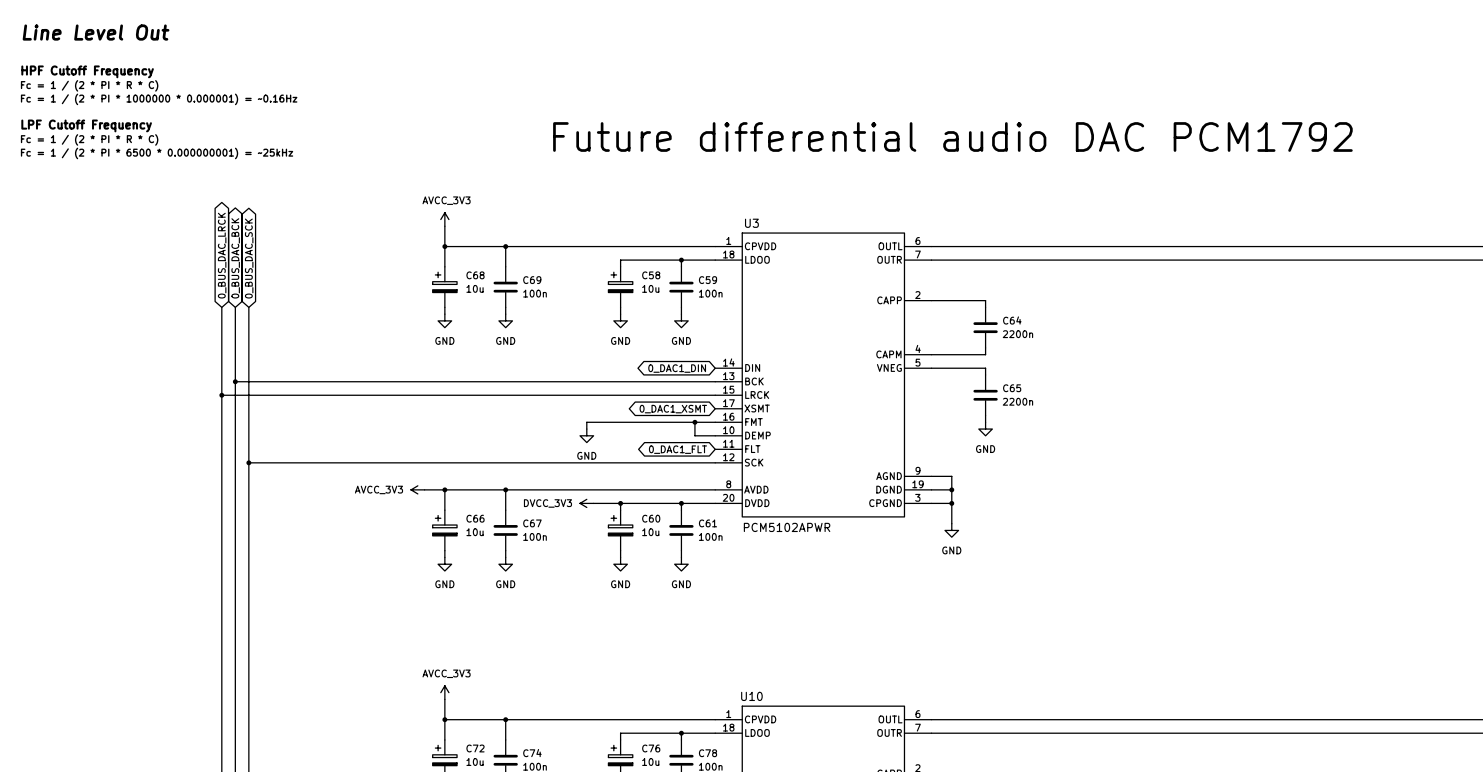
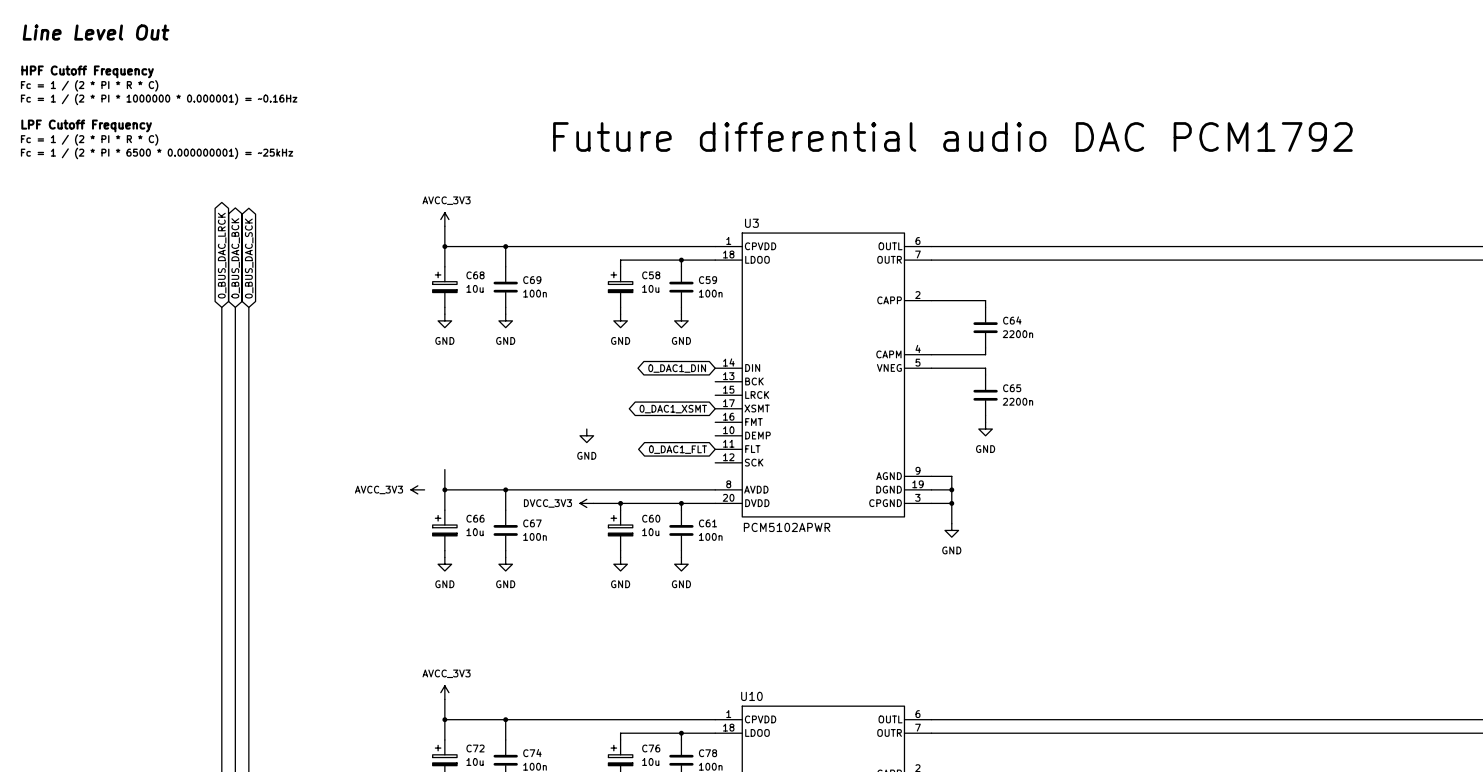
wire: (235, 381) (715, 381) -> none
junction: (235, 381) -> none
wire: (221, 395) (715, 395) -> none
junction: (221, 395) -> none
wire: (694, 422) (694, 435) (715, 435) -> none
junction: (694, 422) -> none
wire: (715, 422) (586, 422) (586, 429) -> none
wire: (248, 462) (715, 462) -> none
junction: (248, 462) -> none
wire: (424, 489) (444, 489) -> (444, 469) (444, 489)

